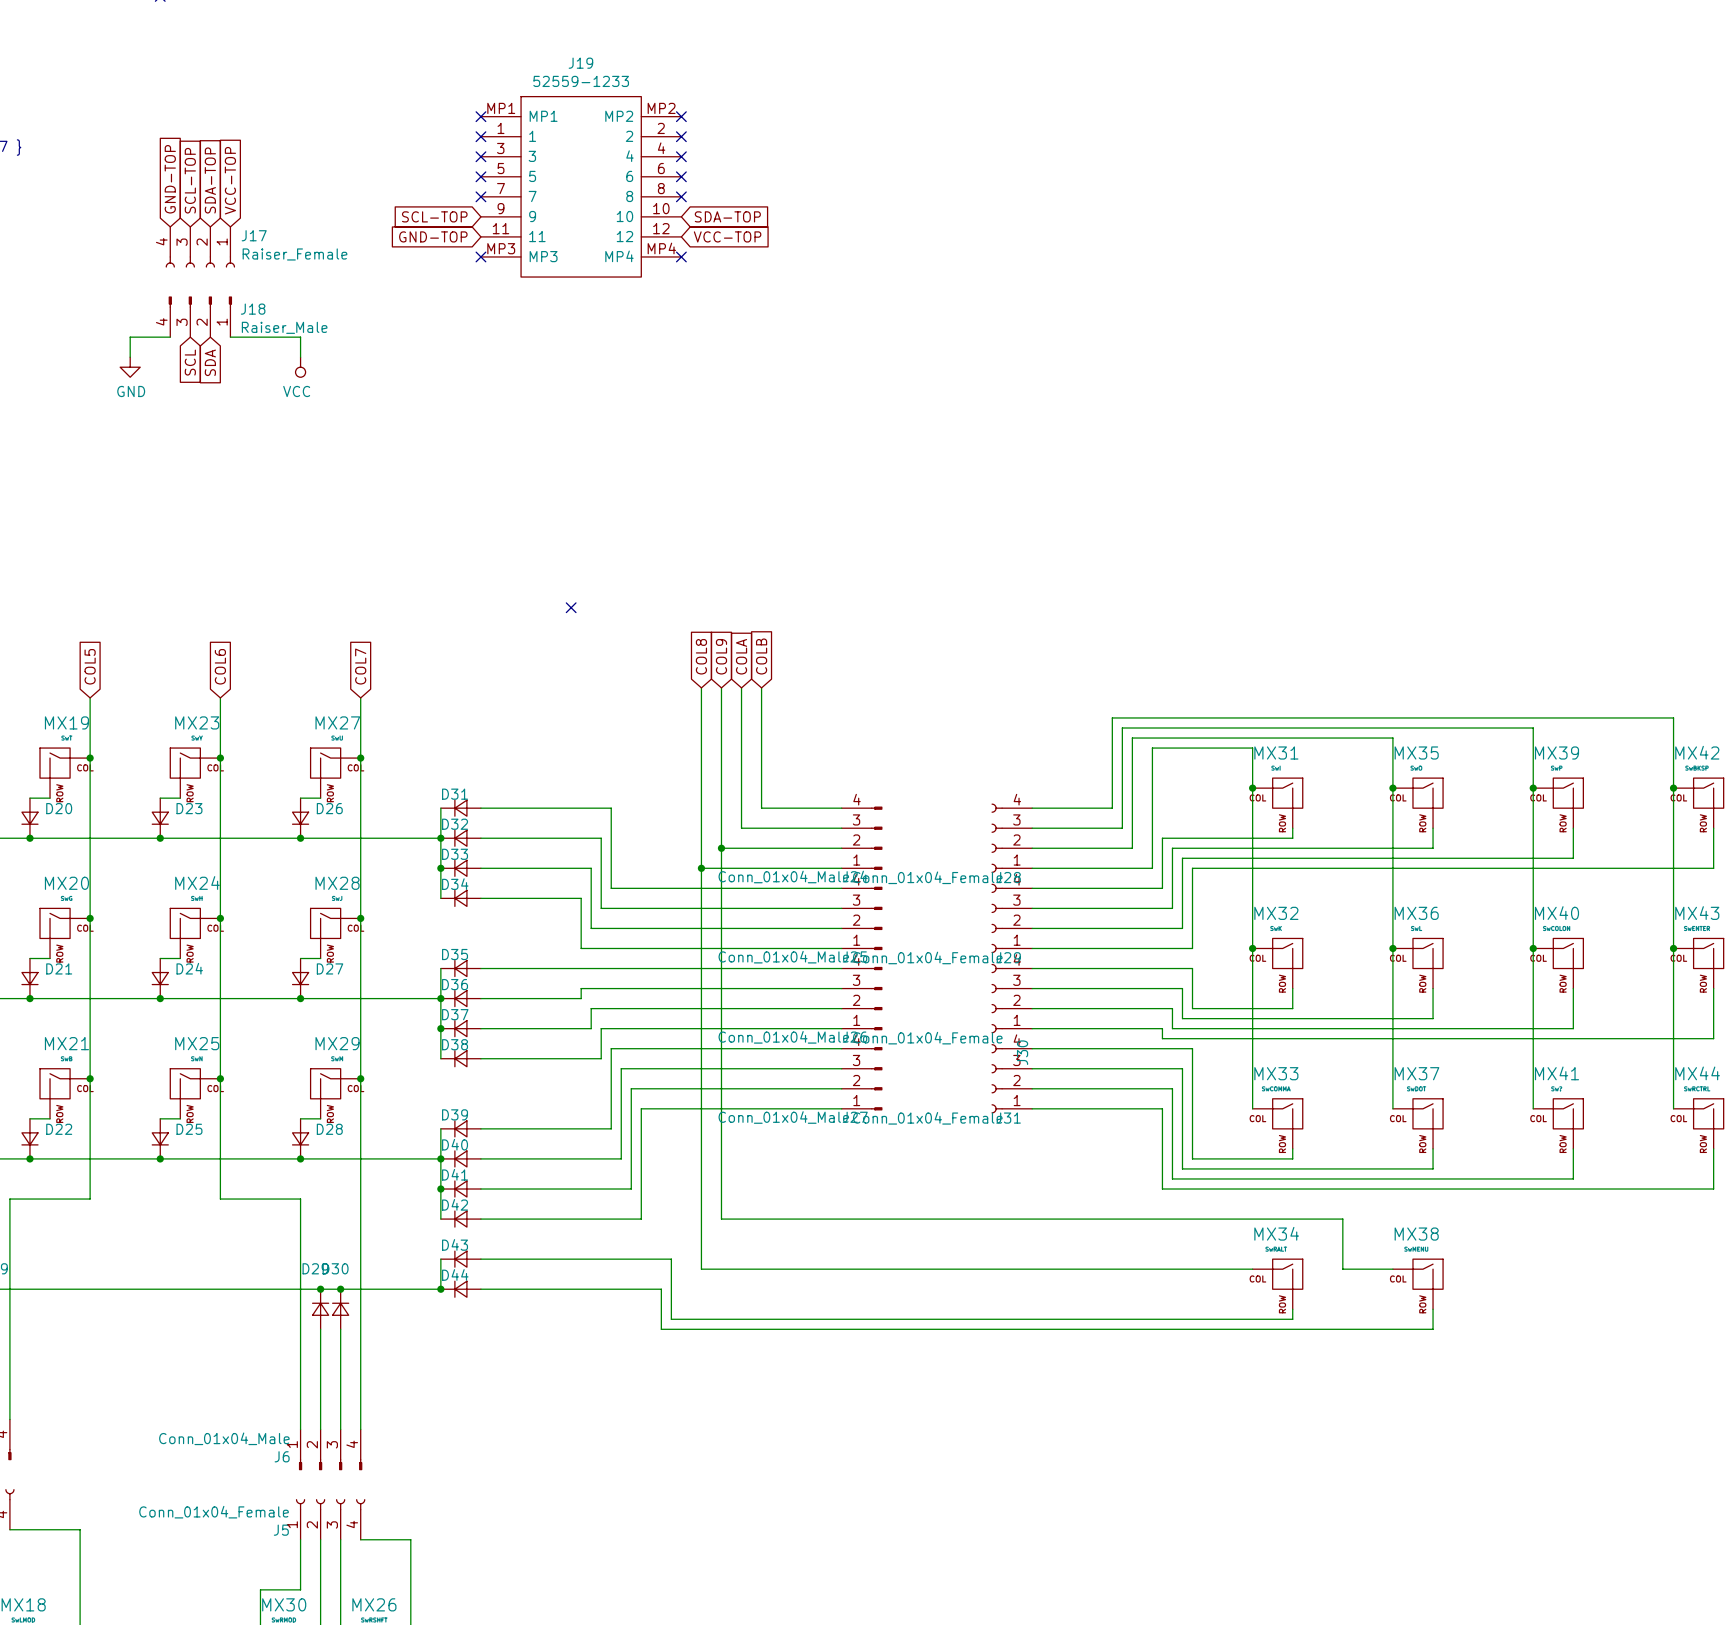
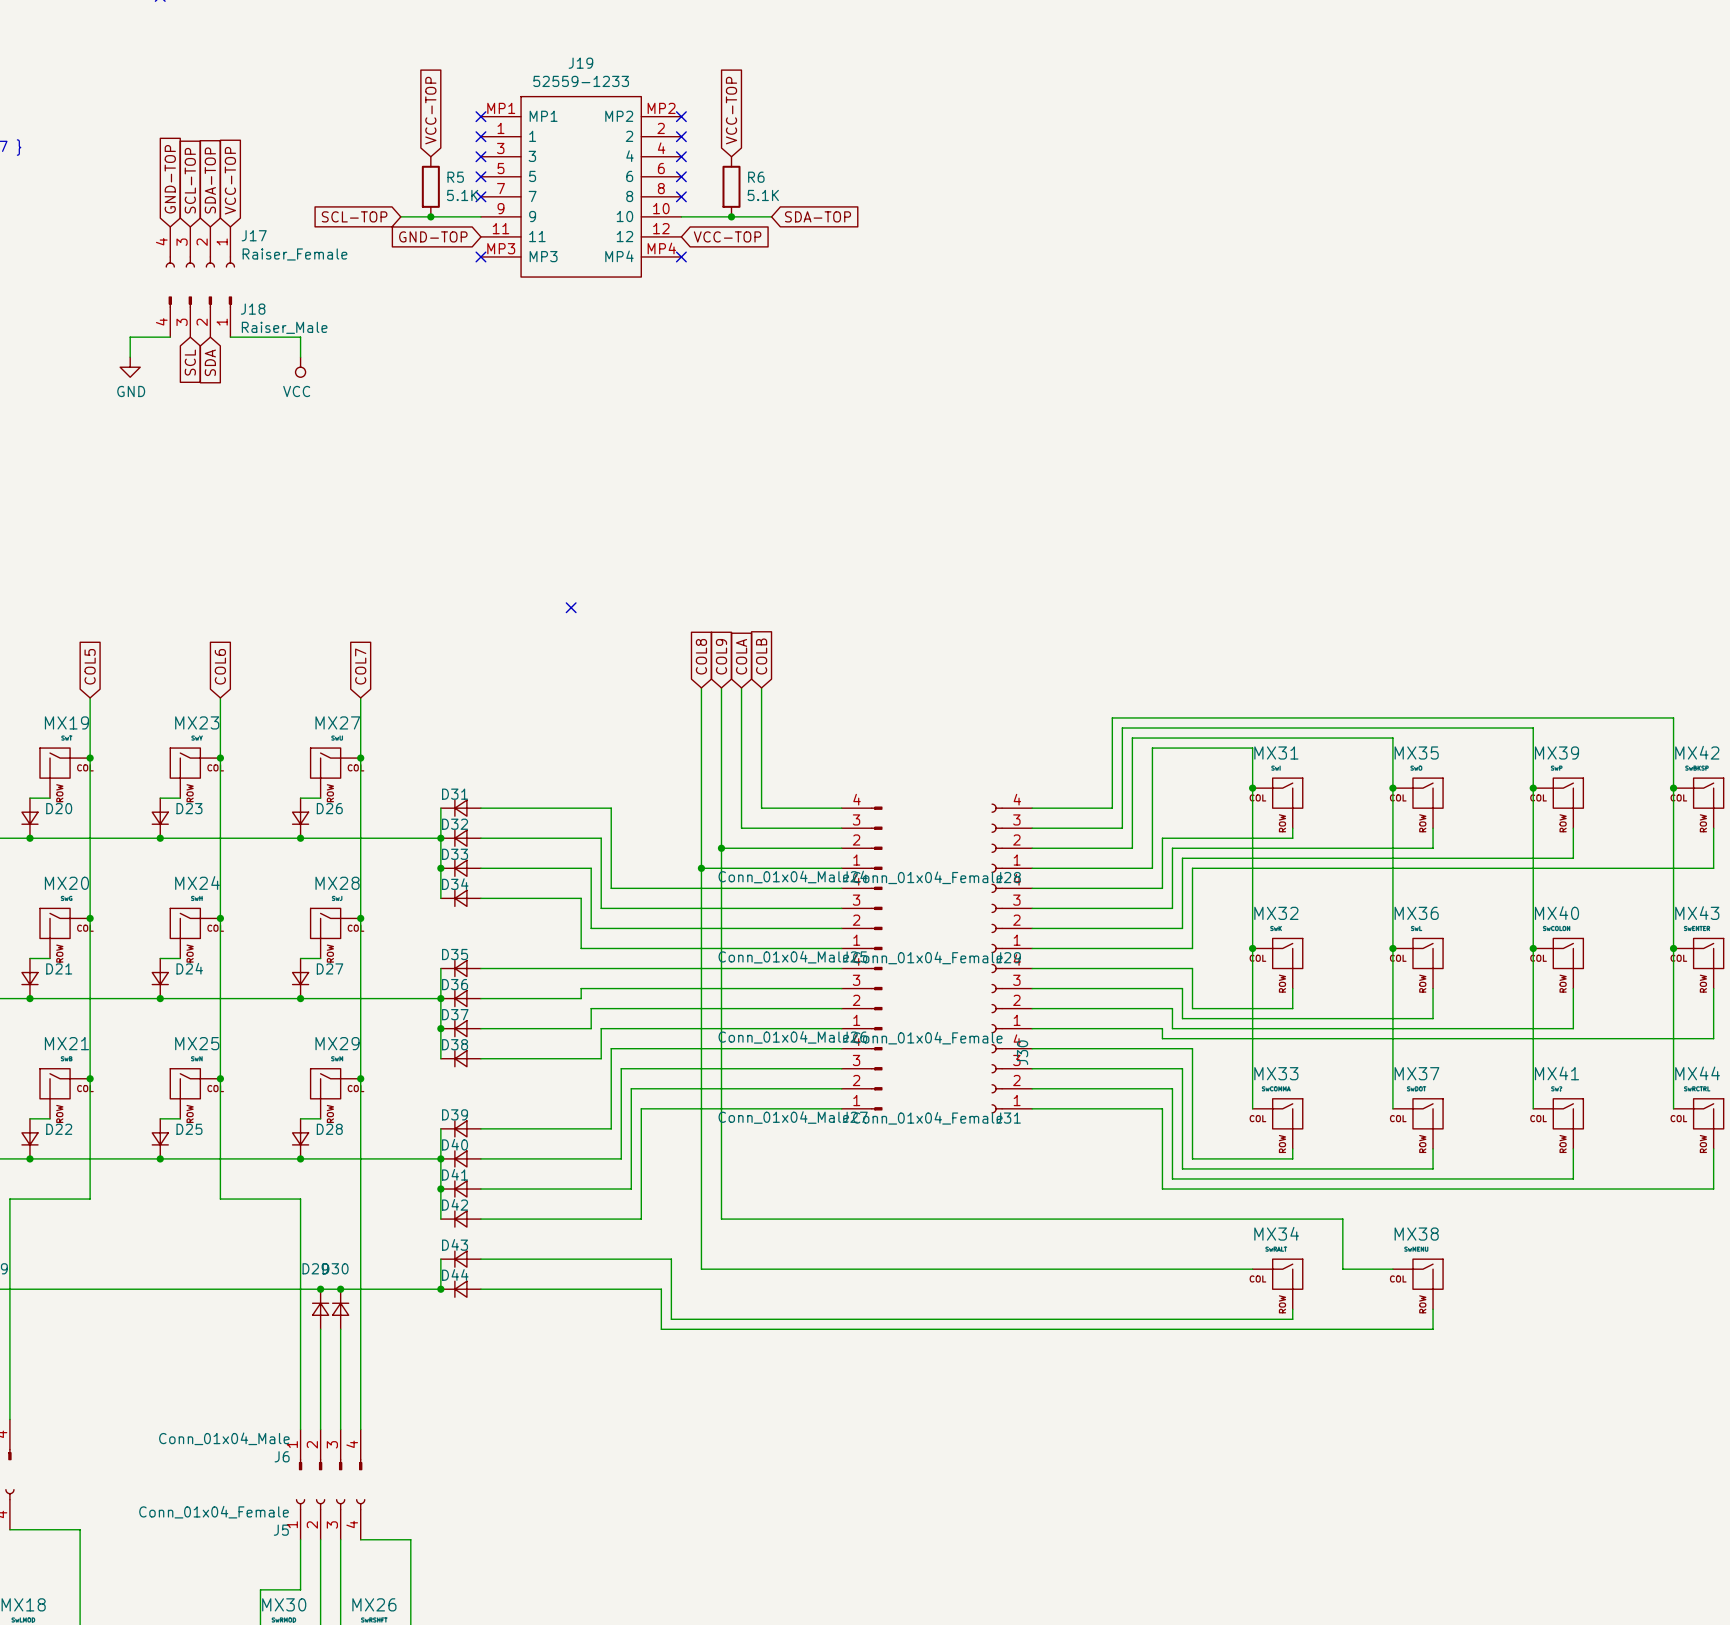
global label: none -> VCC-TOP (430, 110)
global label: none -> VCC-TOP (731, 110)
R5: none -> 5.1K (430, 186)
R6: none -> 5.1K (731, 186)
wire: none -> (400, 216) (480, 216)
junction: none -> (430, 216)
global label position: SCL-TOP (434, 216) -> SCL-TOP (354, 216)
wire: none -> (681, 216) (771, 216)
global label position: SDA-TOP (727, 216) -> SDA-TOP (818, 216)
junction: none -> (731, 216)

